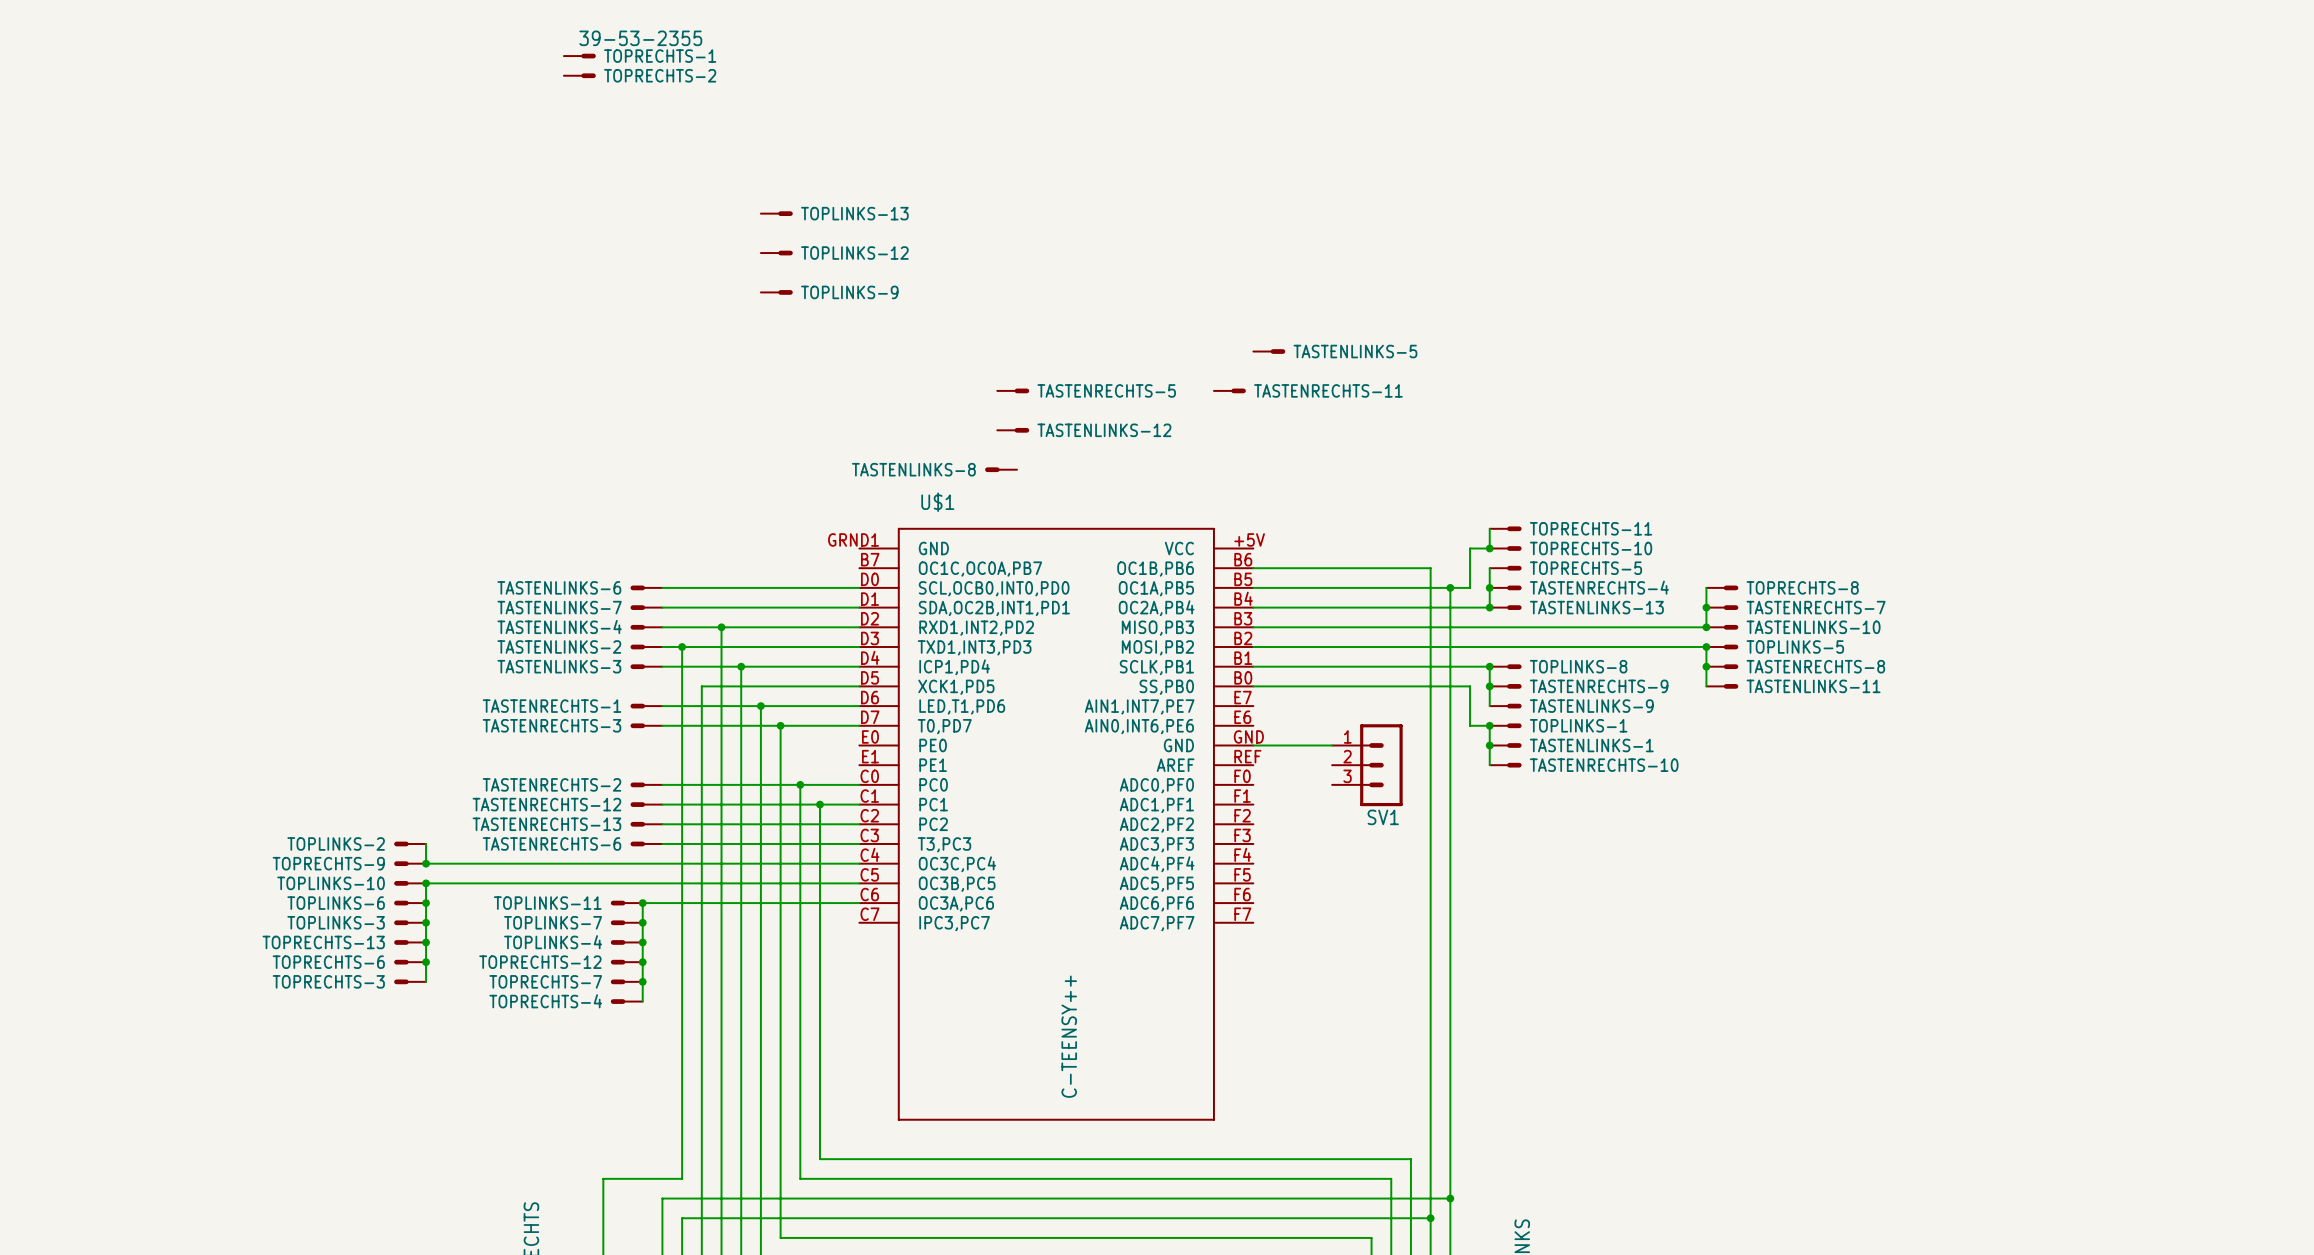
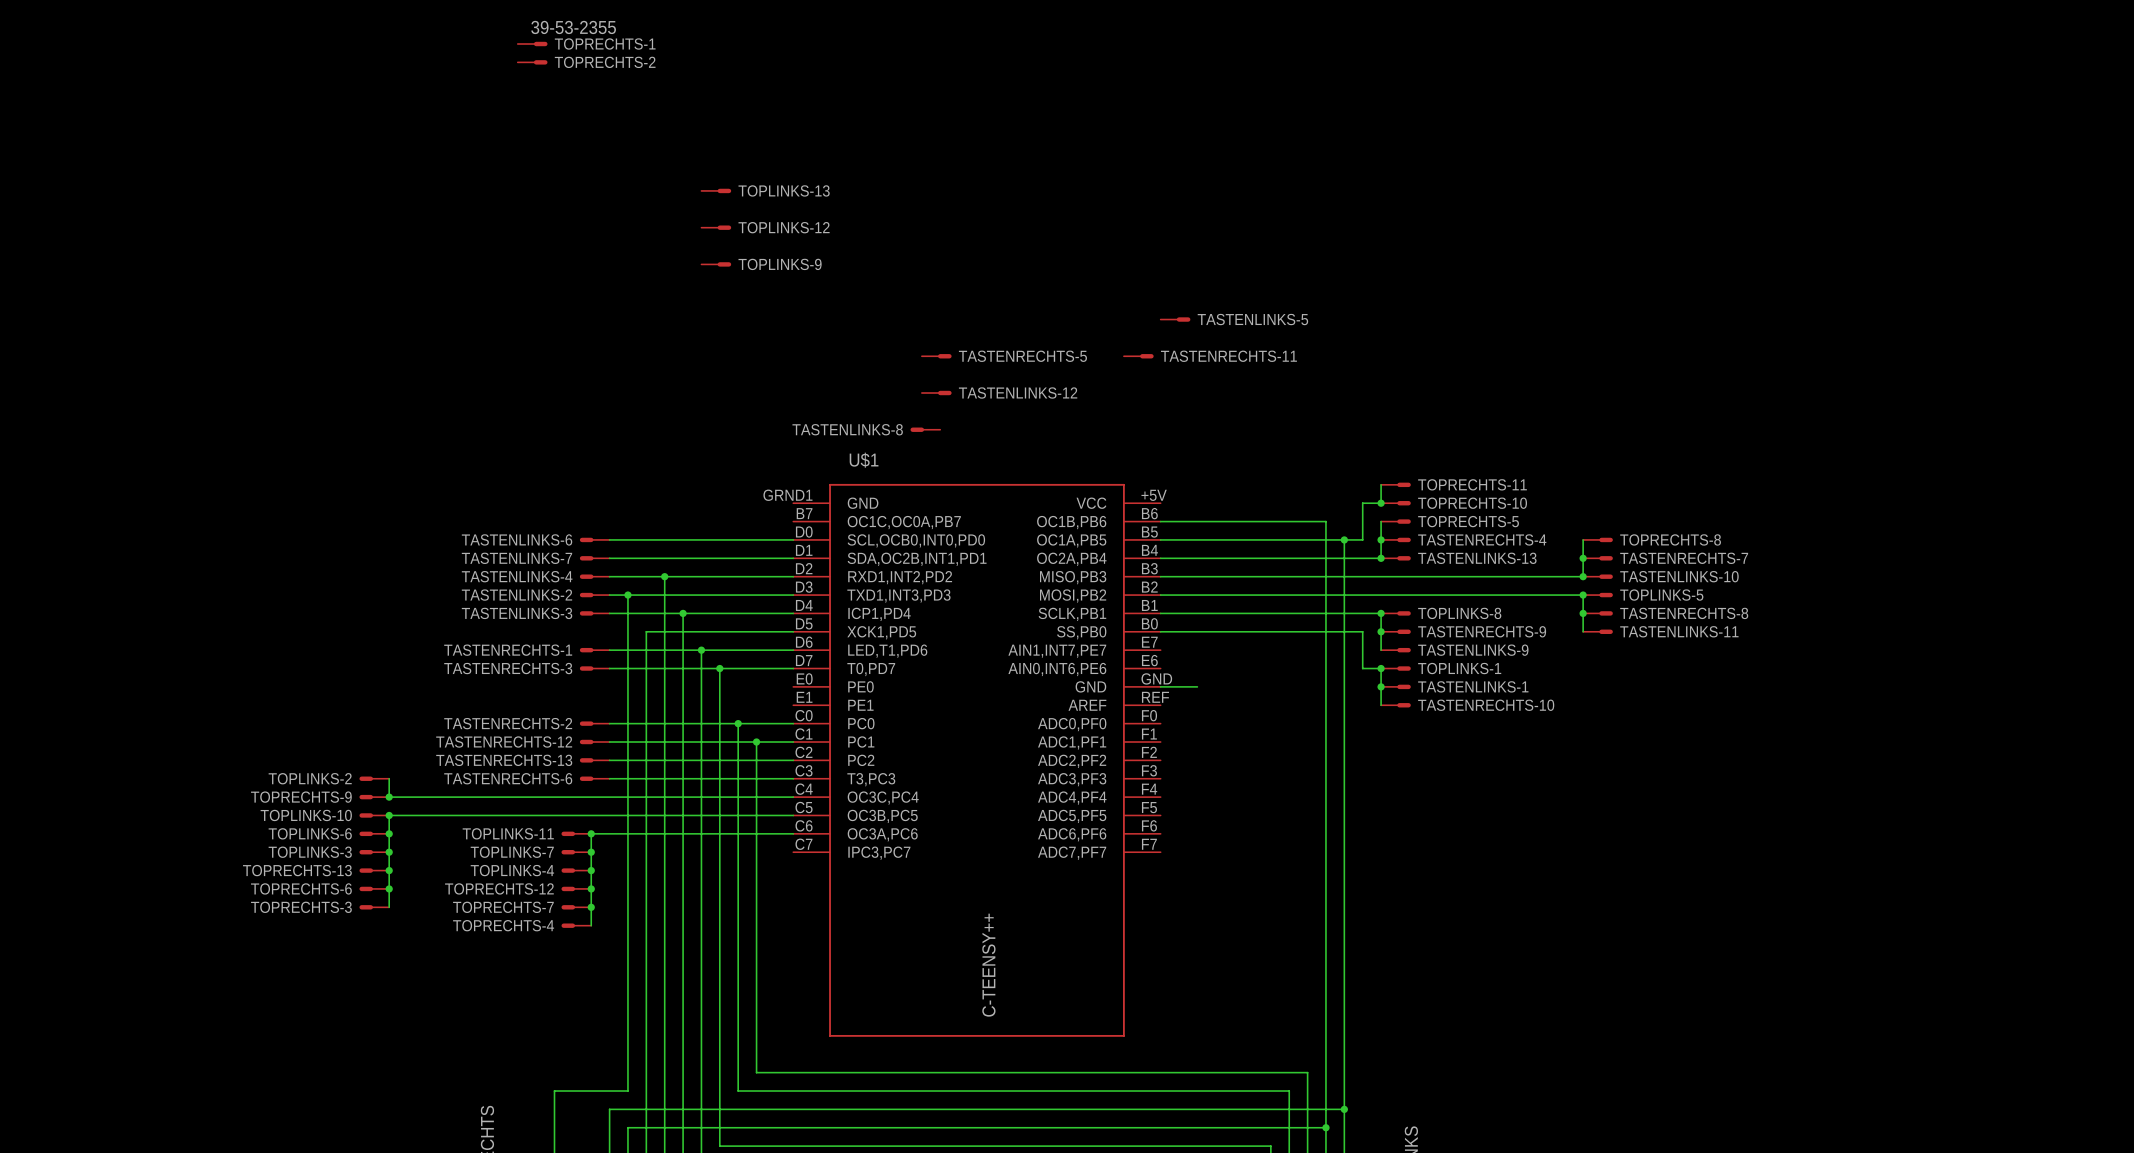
wire: (1292, 745) (1332, 745) -> none
SV1: (1367, 765) -> none

